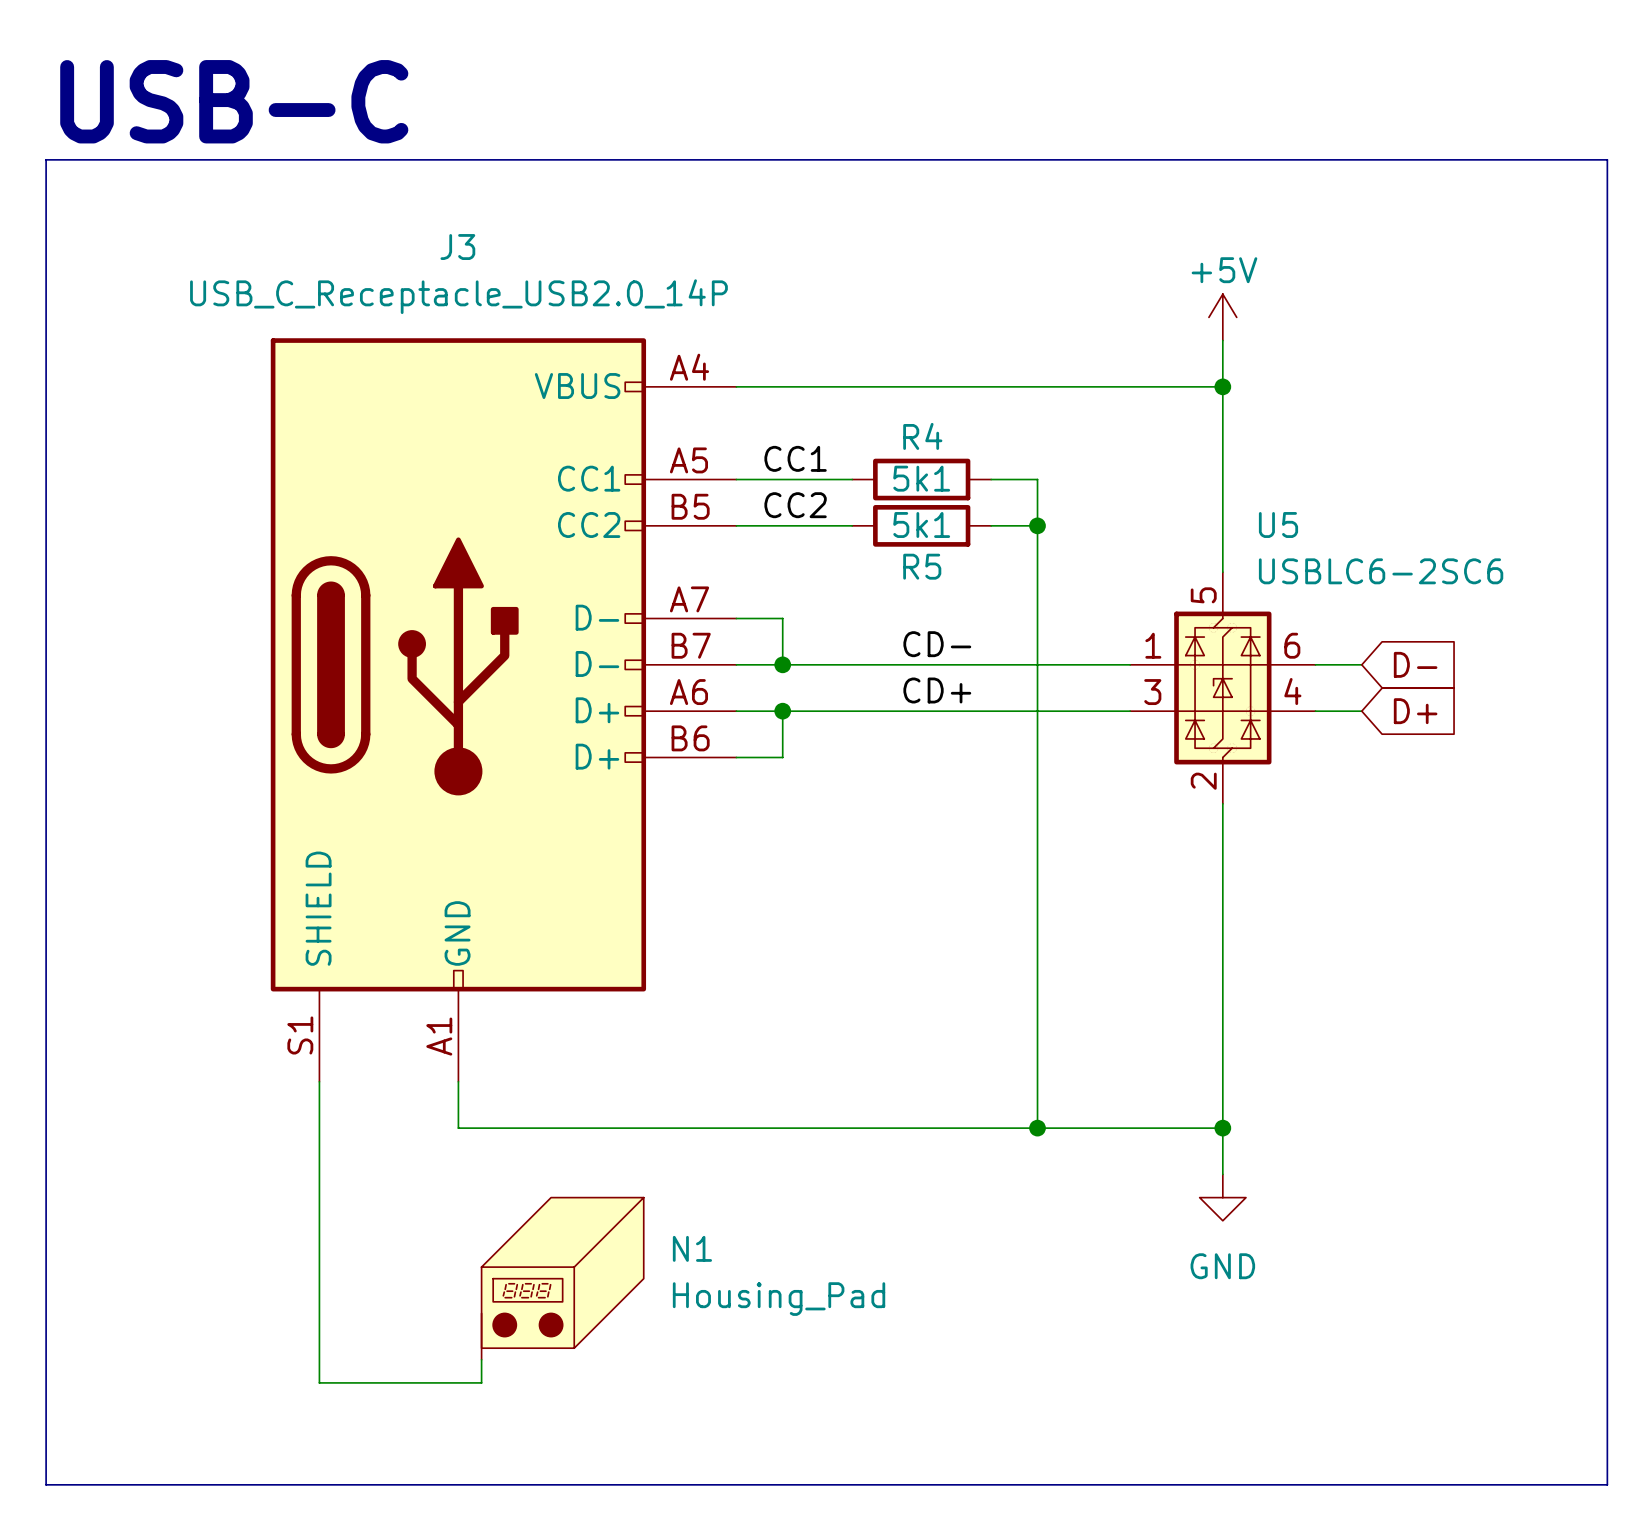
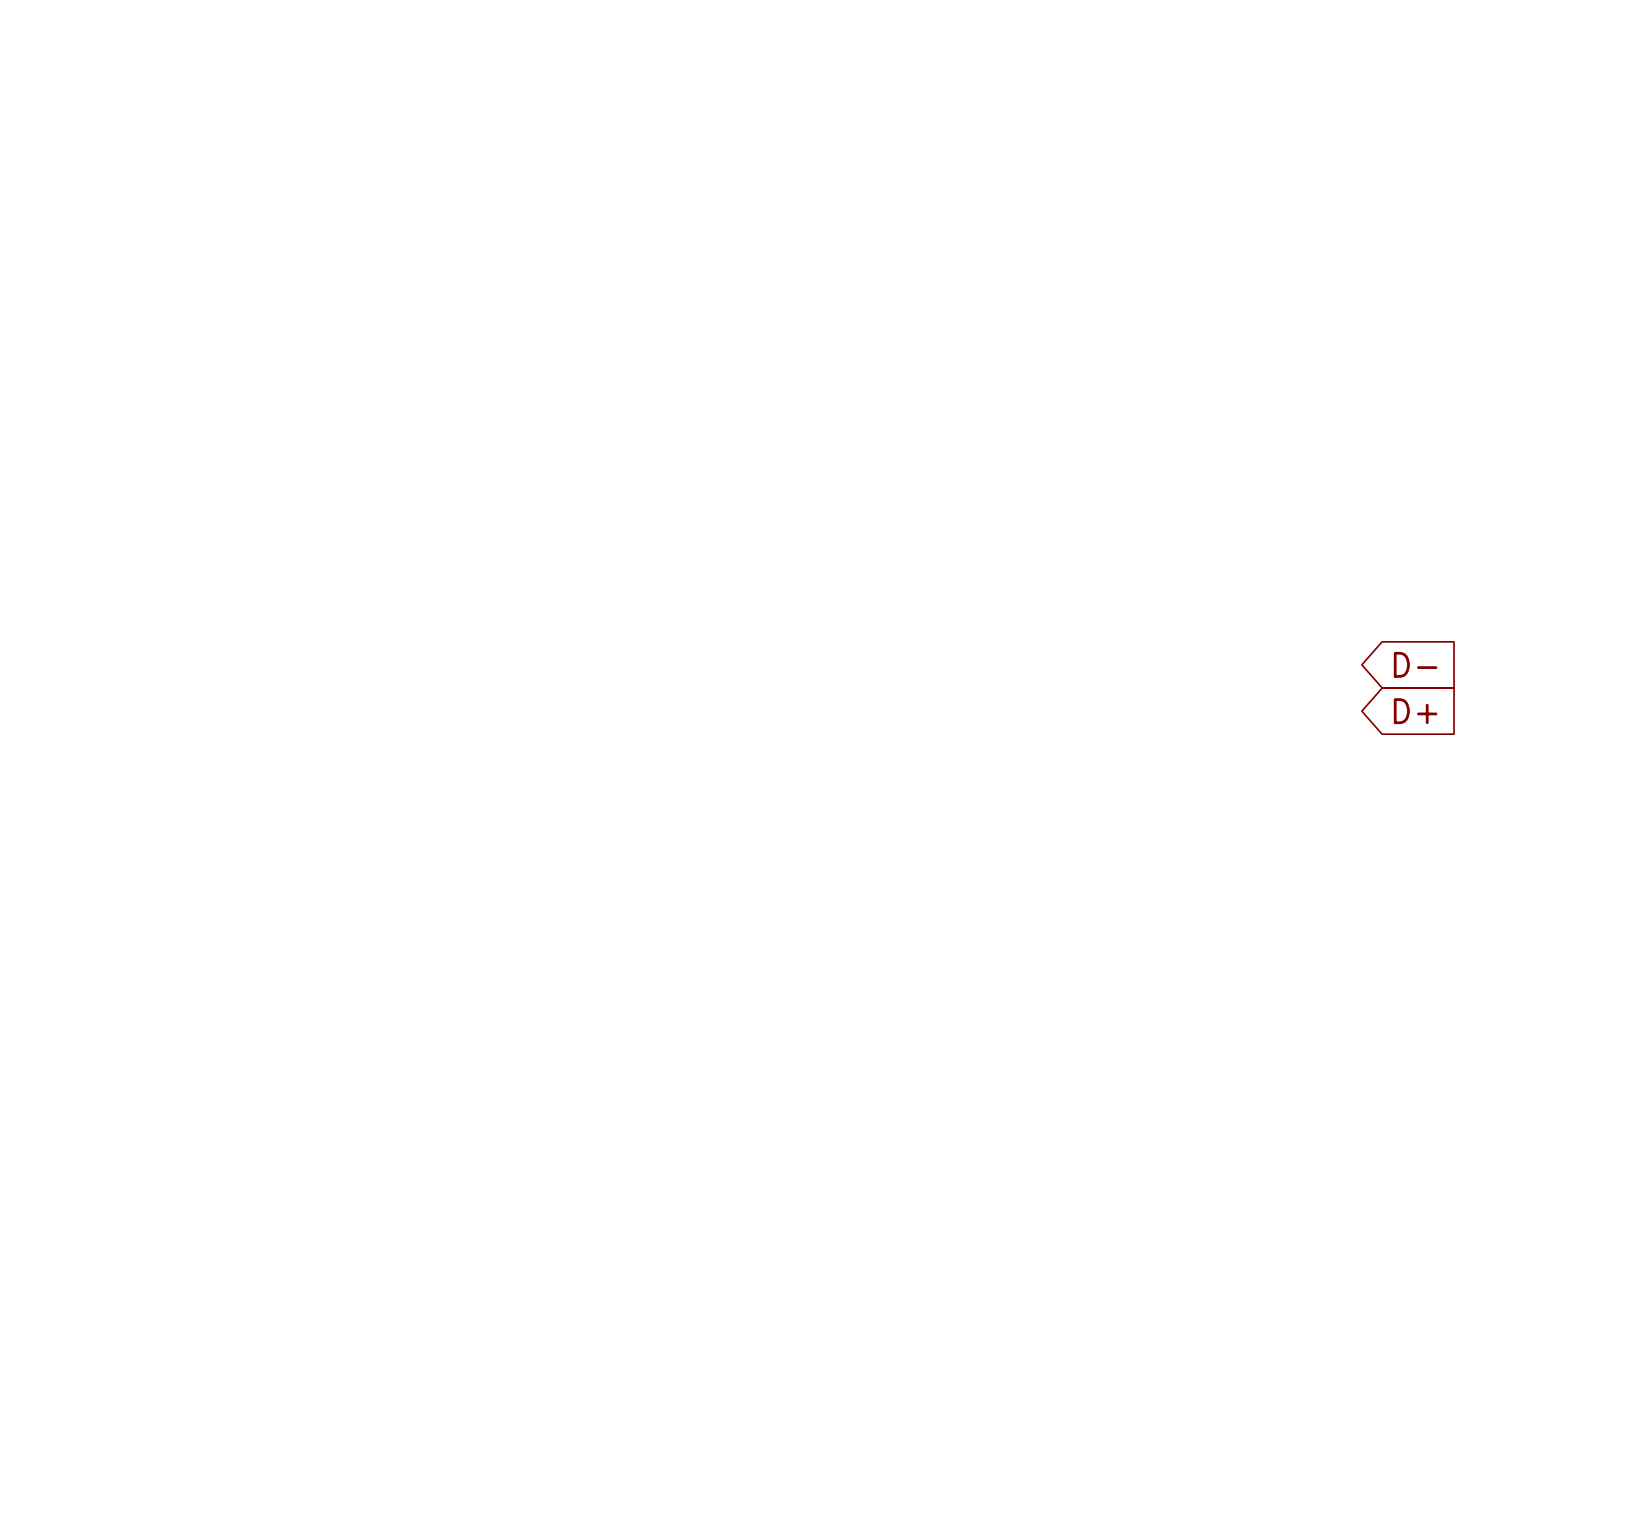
text: USB-C (234, 101) -> none
line: (46, 159) (1607, 159) (1607, 1484) (46, 1484) (46, 159) -> none
power symbol: +5V (1222, 317) -> none
wire: (1222, 340) (1222, 572) -> none
wire: (736, 386) (1222, 386) -> none
junction: (1222, 386) -> none
label: CC1 (795, 458) -> none
wire: (736, 479) (852, 479) -> none
R4: 5k1 (921, 479) -> none
wire: (991, 479) (1037, 479) (1037, 1128) -> none
label: CC2 (795, 505) -> none
wire: (736, 525) (852, 525) -> none
R5: 5k1 (921, 525) -> none
wire: (991, 525) (1037, 525) -> none
junction: (1037, 525) -> none
wire: (736, 618) (782, 618) (782, 664) -> none
label: CD- (937, 644) -> none
wire: (736, 664) (1130, 664) -> none
junction: (782, 664) -> none
wire: (1315, 664) (1361, 664) -> none
U5: USBLC6-2SC6 (1222, 688) -> none
label: CD+ (937, 690) -> none
J3: USB_C_Receptacle_USB2.0_14P (503, 710) -> none
wire: (736, 711) (1130, 711) -> none
wire: (782, 711) (782, 757) (736, 757) -> none
junction: (782, 711) -> none
wire: (1315, 711) (1361, 711) -> none
wire: (1222, 803) (1222, 1174) -> none
wire: (319, 1081) (319, 1382) (481, 1382) (481, 1359) -> none
wire: (458, 1081) (458, 1128) (1222, 1128) -> none
junction: (1037, 1128) -> none
junction: (1222, 1128) -> none
power symbol: GND (1222, 1197) -> none
N1: Housing_Pad (562, 1278) -> none

